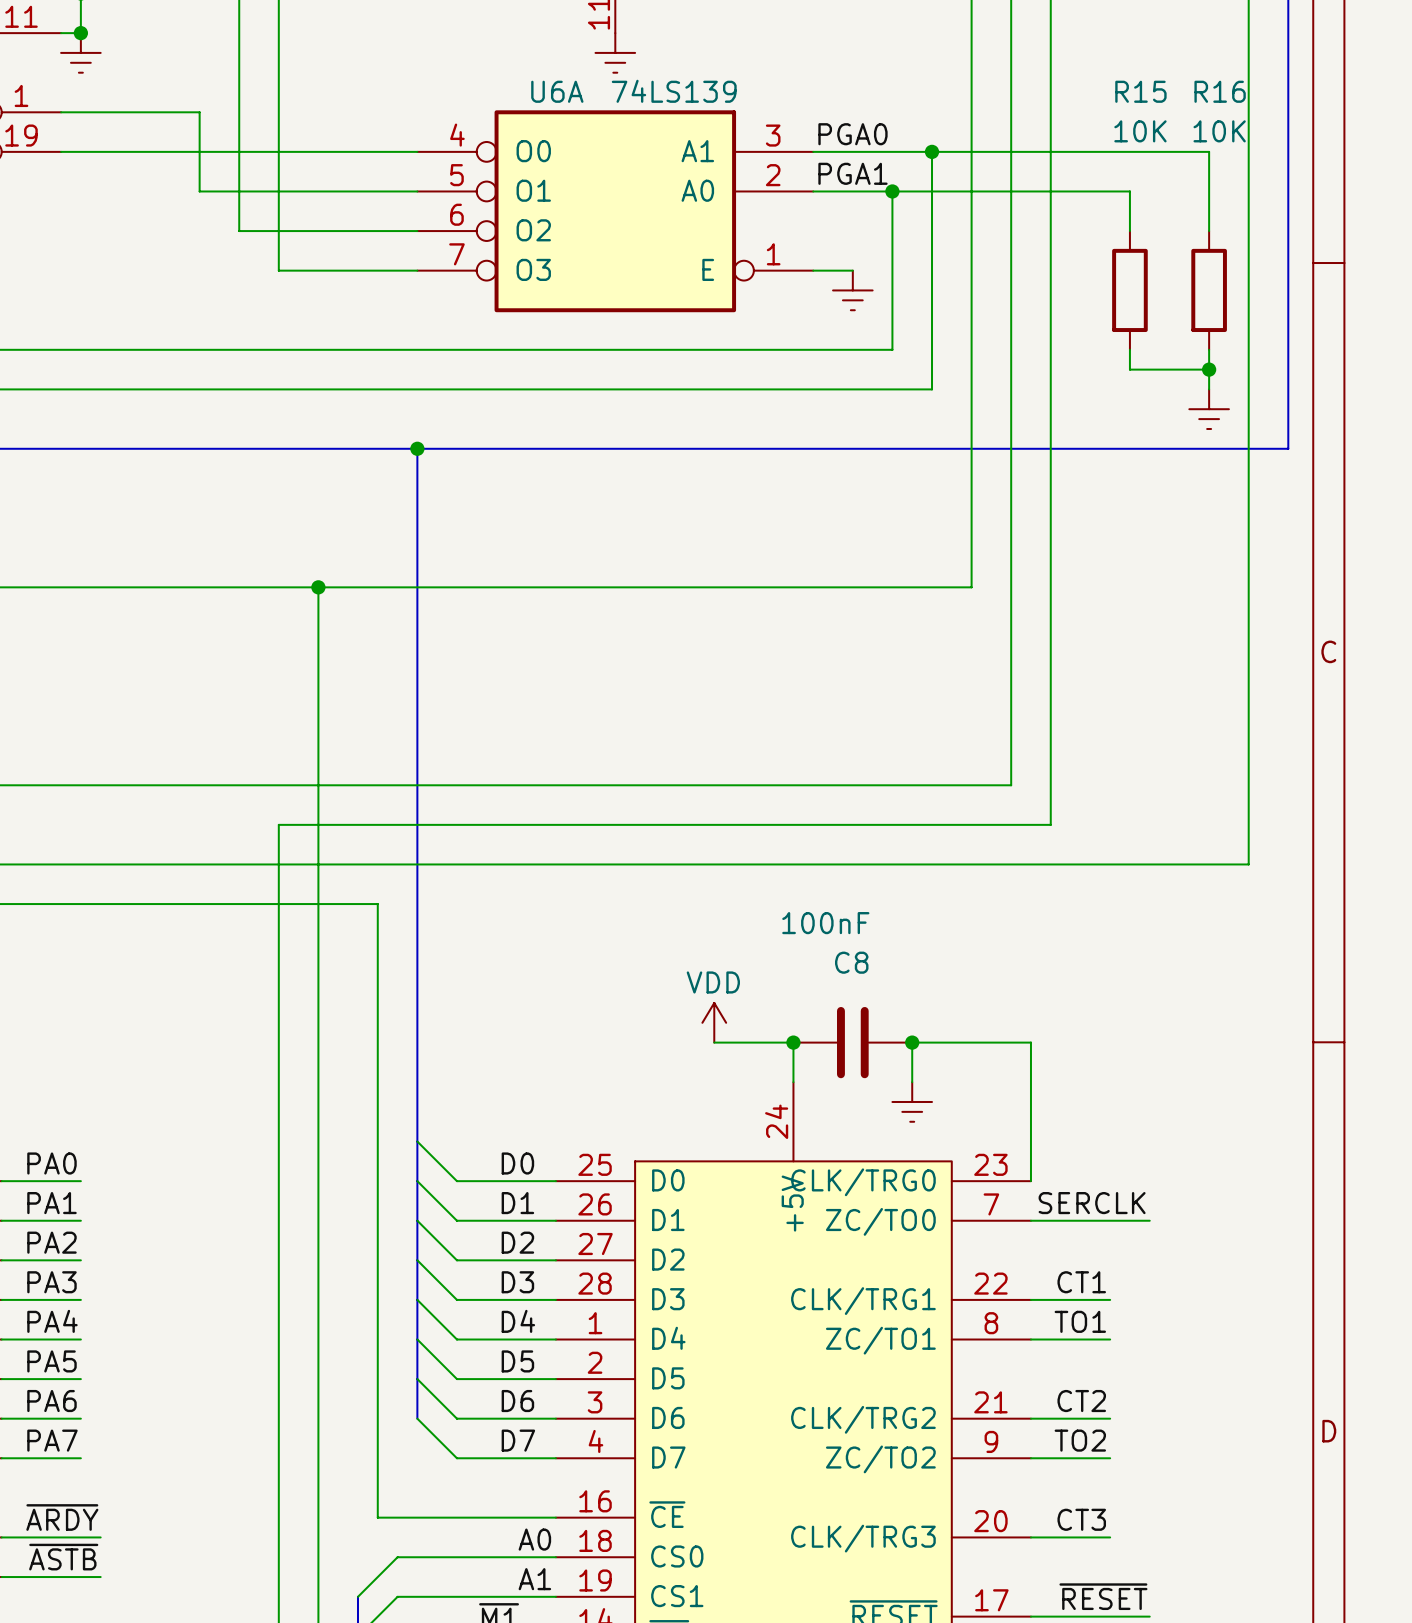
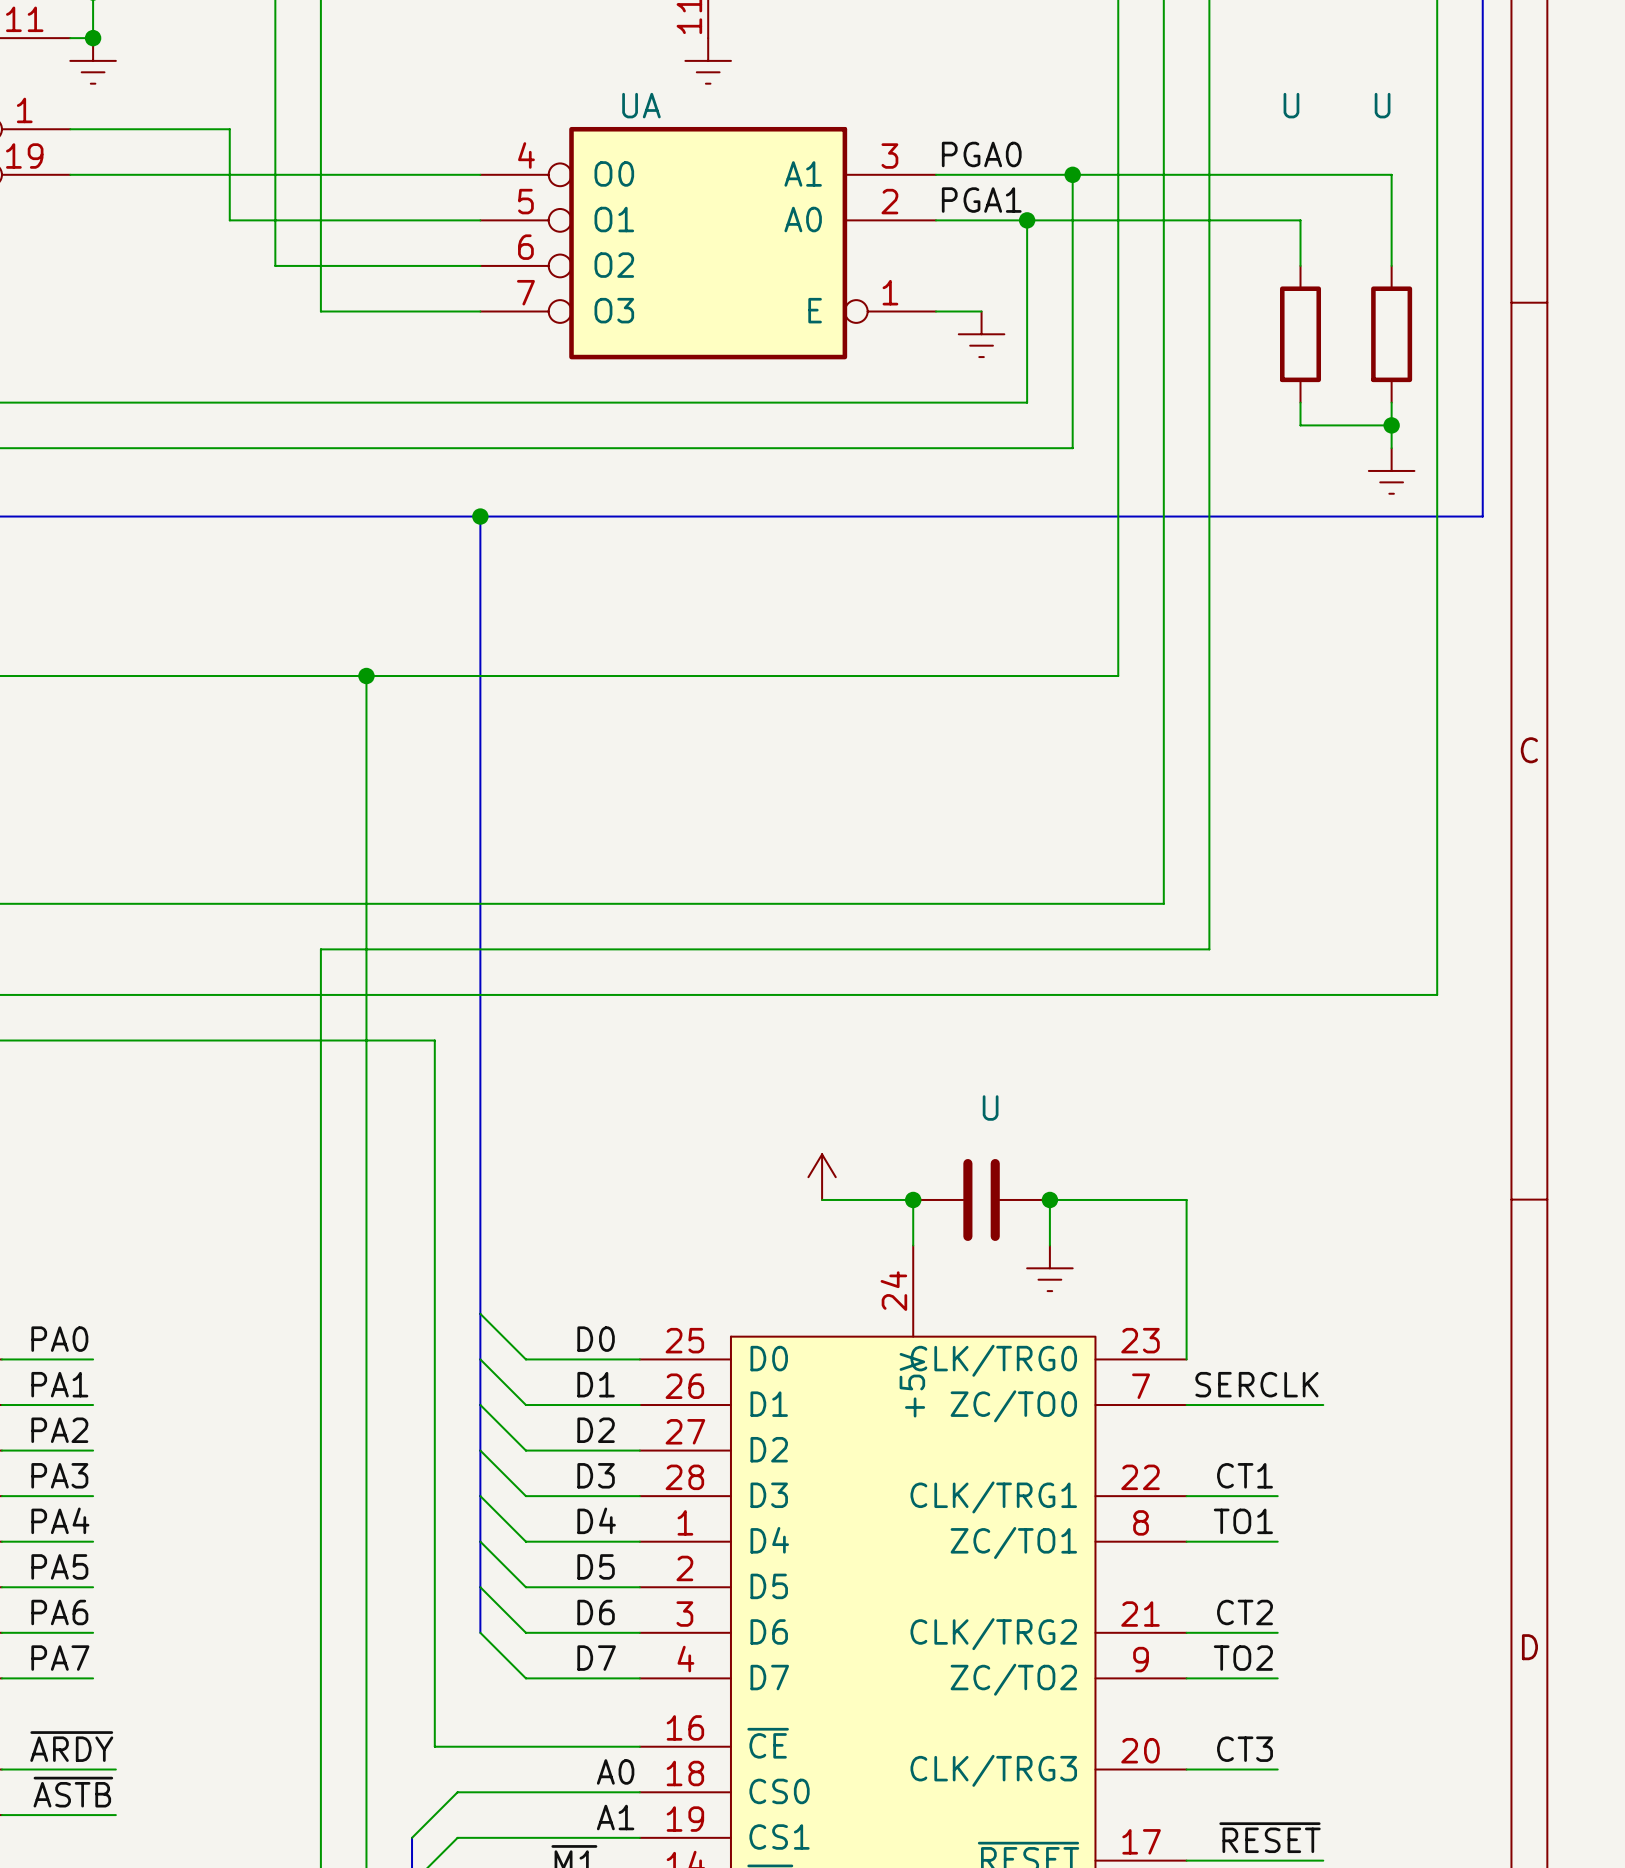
U6A name: U6A (557, 91) -> UA (641, 105)
U6A value: 74LS139 (674, 91) -> none
R15 name: R15 (1140, 91) -> U (1291, 105)
R16 name: R16 (1220, 91) -> U (1382, 105)
R15 value: 10K (1140, 131) -> none
R16 value: 10K (1219, 131) -> none
C8 value: 100nF (825, 923) -> none
C8 name: C8 (851, 962) -> U (990, 1107)
power symbol text: VDD (713, 982) -> none

